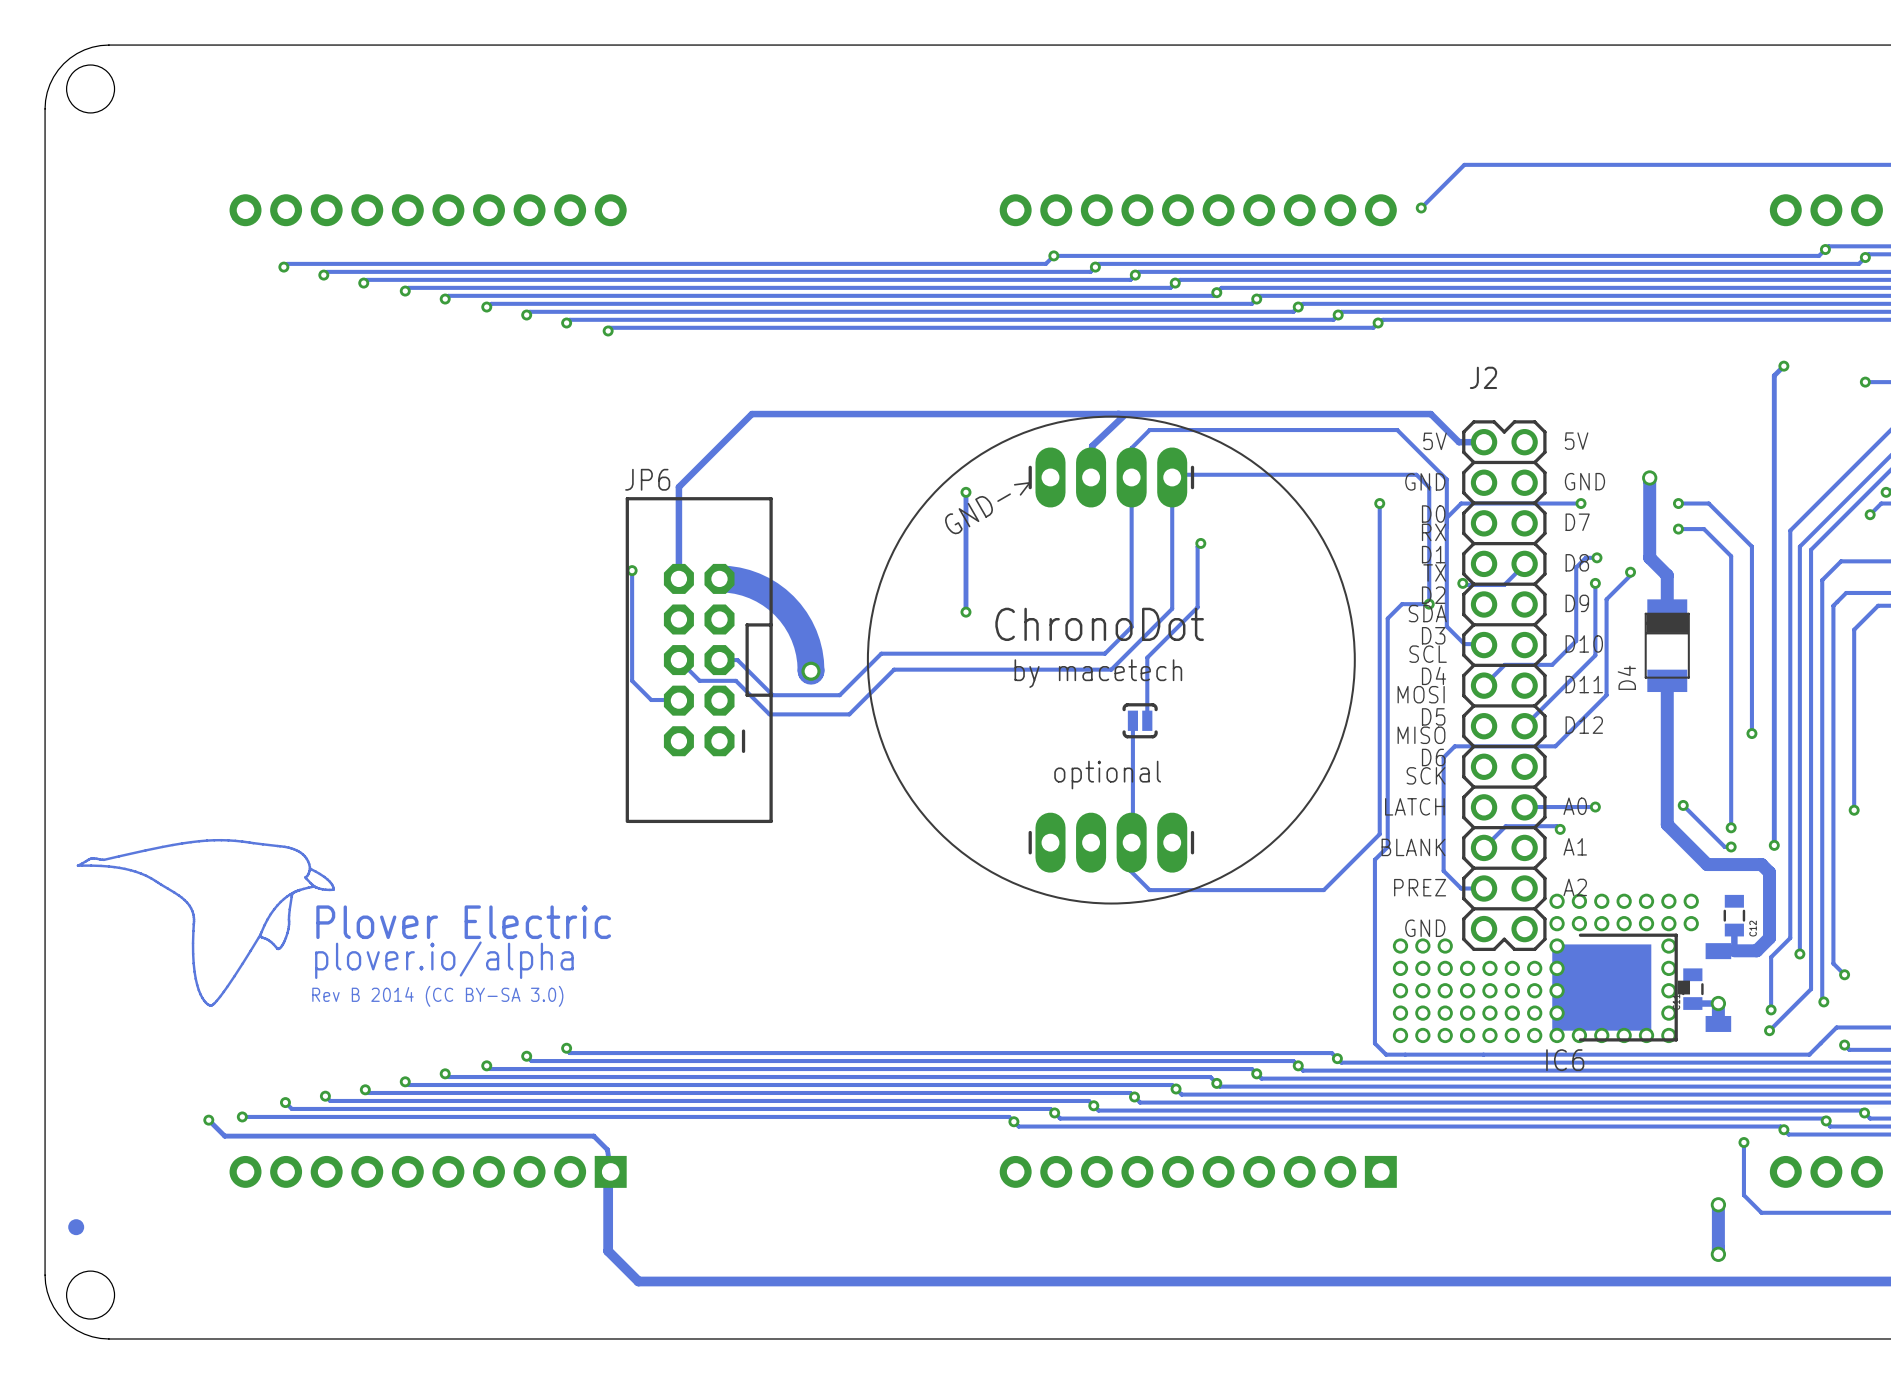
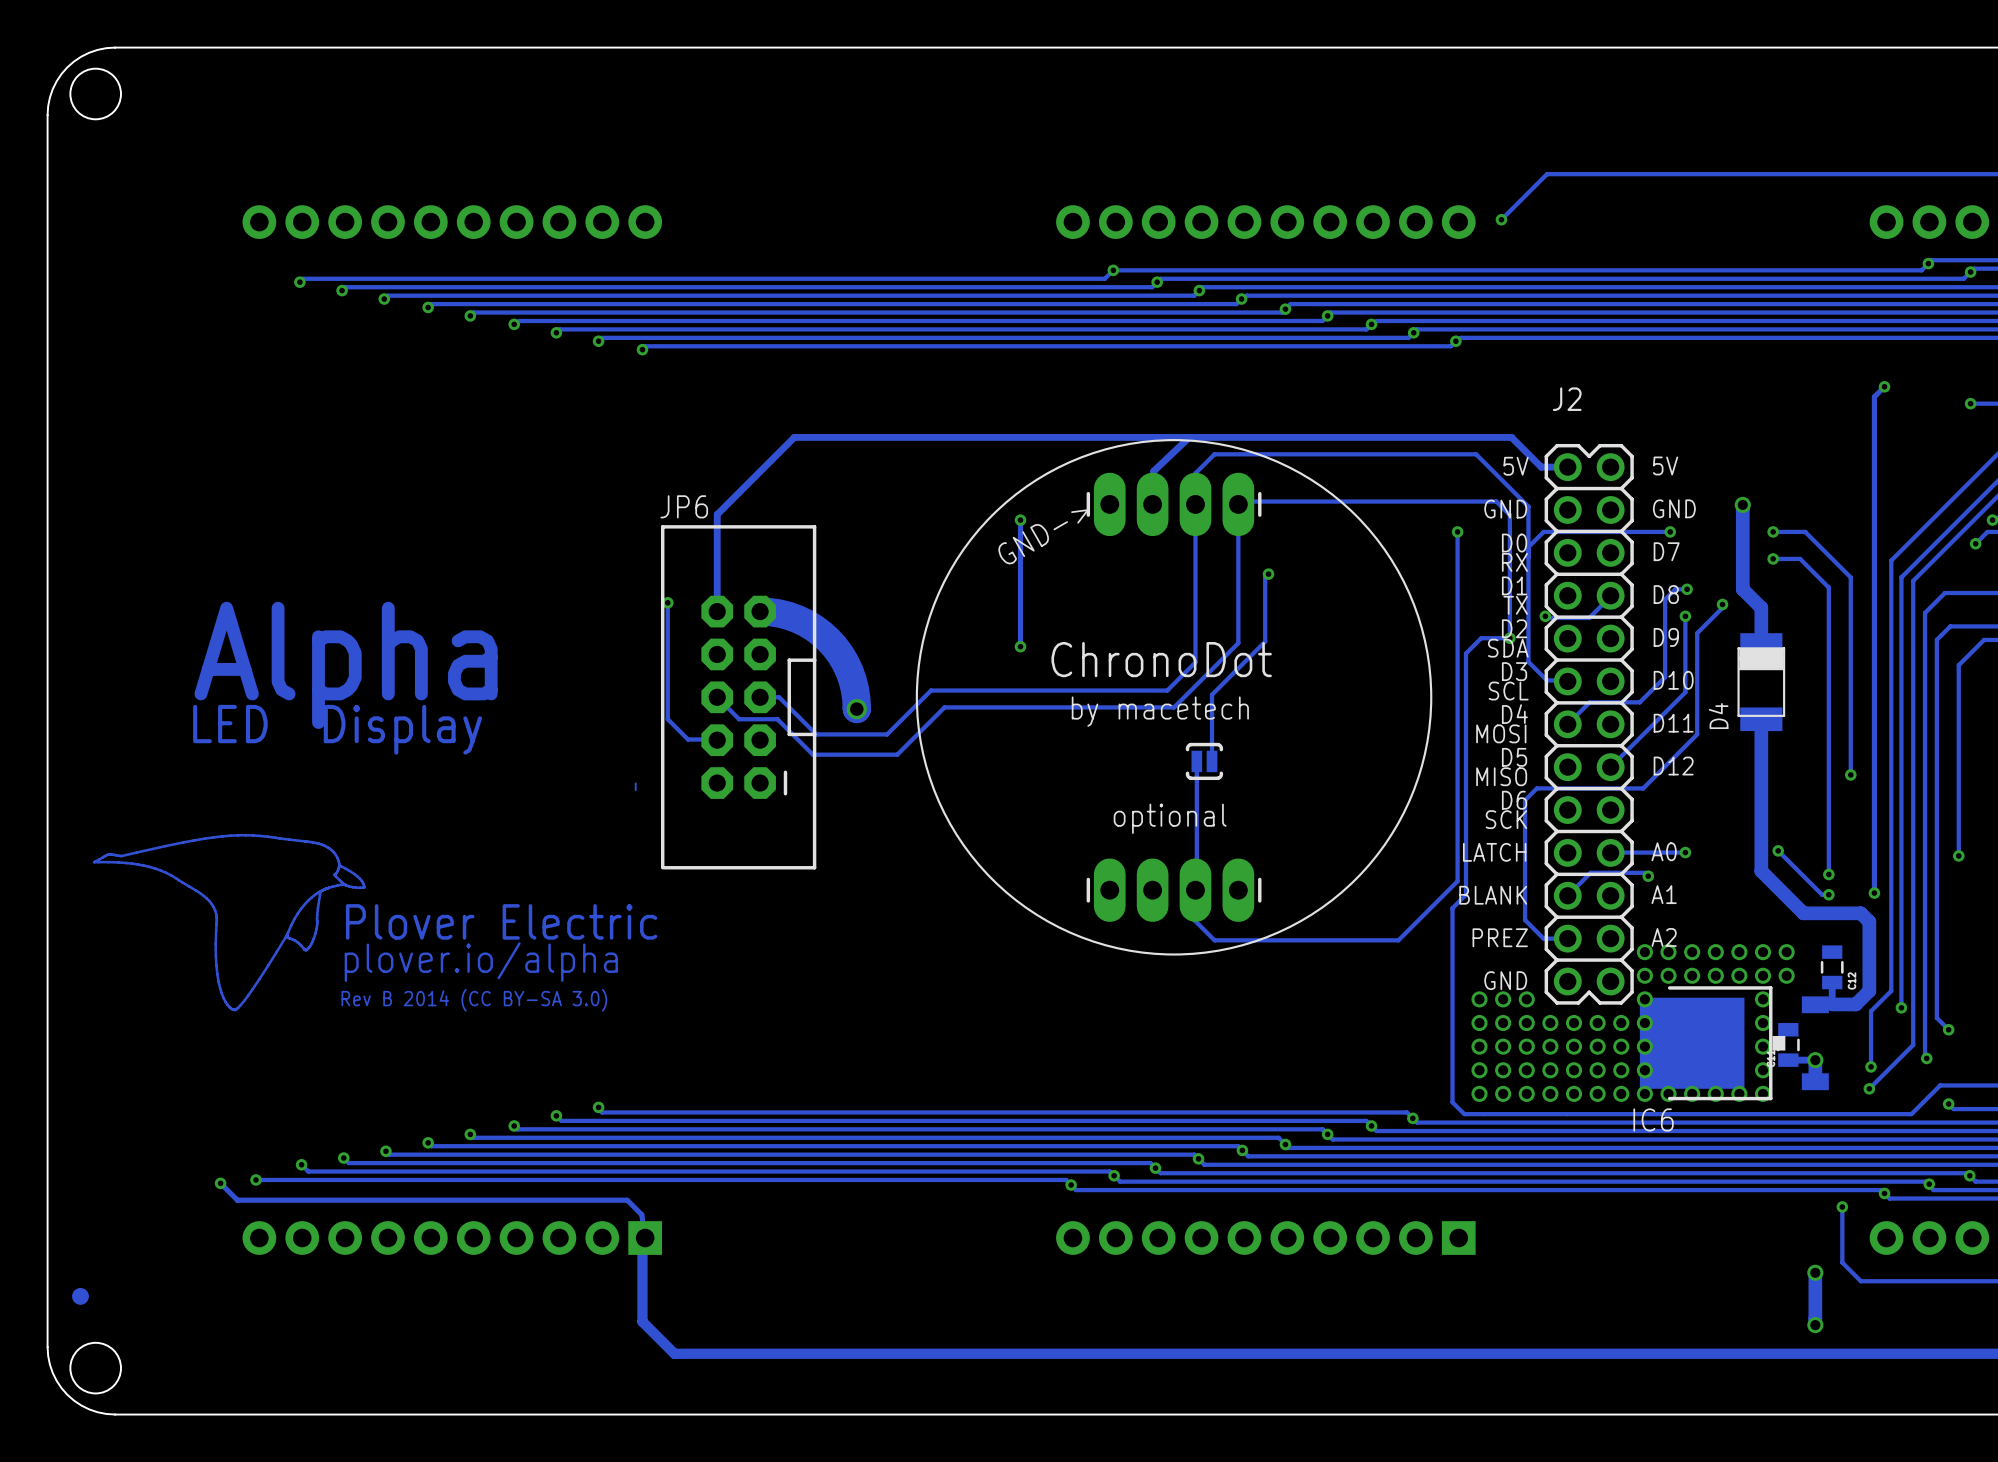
text: none -> Alpha (346, 665)
text: none -> LED Display (337, 729)
track: none -> (635, 783) (635, 790)
track: (309, 868) (305, 877) (316, 887) -> (339, 865) (334, 874) (345, 885)
track: (299, 890) (314, 886) (322, 889) (333, 889) (327, 879) (310, 868) (306, 858) (298, 851) (284, 846) (242, 841) (214, 840) (182, 843) (103, 859) (90, 858) (77, 865) (108, 866) (135, 871) (151, 878) (187, 902) (193, 917) (193, 953) (195, 978) (202, 997) (210, 1005) -> (328, 887) (343, 884) (352, 887) (364, 887) (357, 876) (339, 865) (335, 854) (327, 847) (312, 842) (267, 836) (238, 835) (204, 838) (121, 856) (107, 854) (94, 862) (126, 863) (155, 868) (171, 875) (209, 901) (216, 916) (215, 955) (218, 981) (225, 1001) (234, 1009)
track: (299, 890) (287, 896) (277, 905) (267, 919) (260, 935) -> (328, 887) (315, 894) (304, 904) (294, 918) (286, 936)
track: (299, 890) (292, 893) (287, 933) (282, 945) (277, 948) -> (328, 887) (320, 891) (315, 933) (309, 946) (304, 949)
text position: Plover Electric (463, 922) -> Plover Electric (501, 921)
track: (277, 948) (270, 941) (261, 936) (260, 934) (227, 986) (211, 1005) -> (304, 949) (297, 942) (287, 937) (287, 934) (252, 989) (234, 1009)
text position: plover.io/alpha (444, 960) -> plover.io/alpha (481, 962)
text position: Rev B 2014 (CC BY-SA 3.0) (437, 996) -> Rev B 2014 (CC BY-SA 3.0) (474, 1000)

